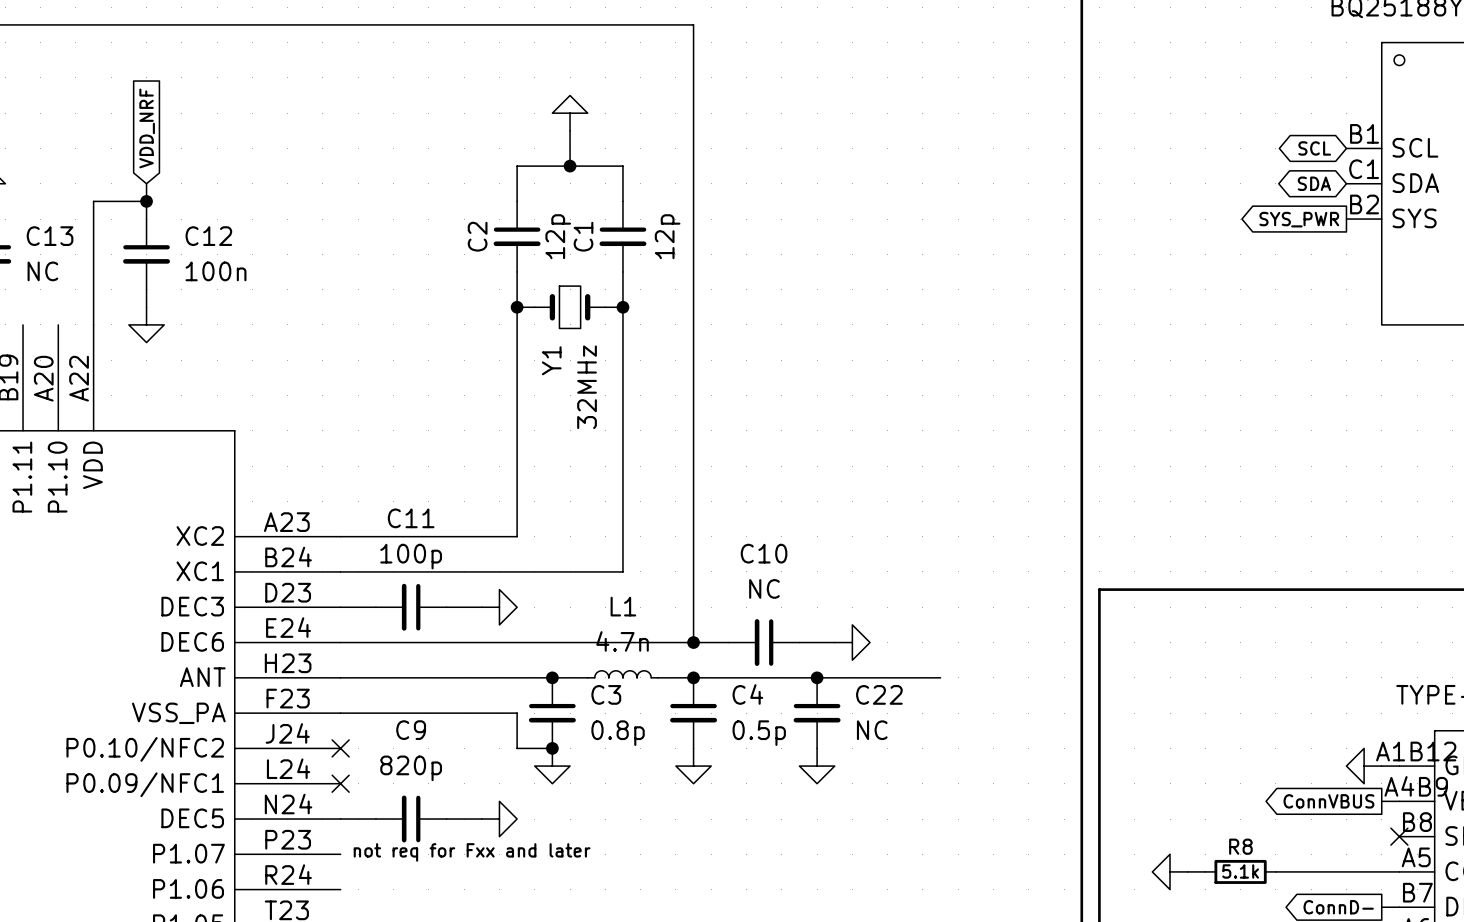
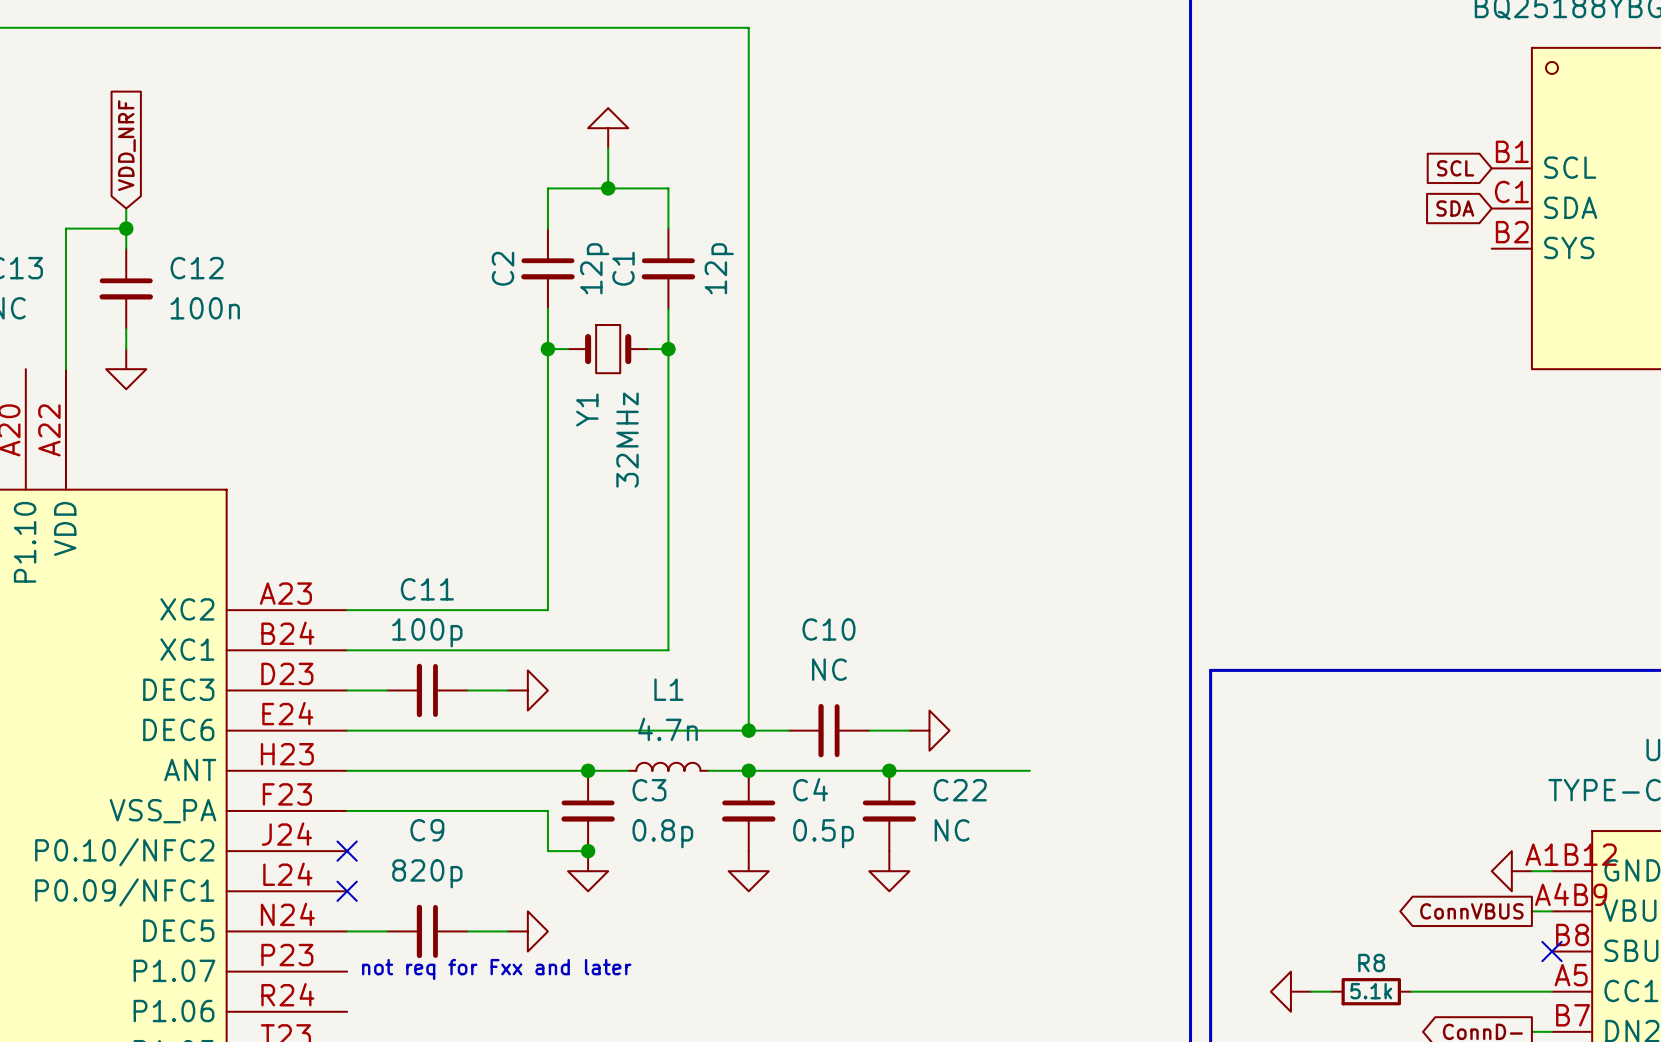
global label shape: bidirectional (1314, 148) -> input (1455, 168)
global label shape: bidirectional (1314, 183) -> input (1455, 208)
global label: SYS_PWR (1299, 219) -> none

